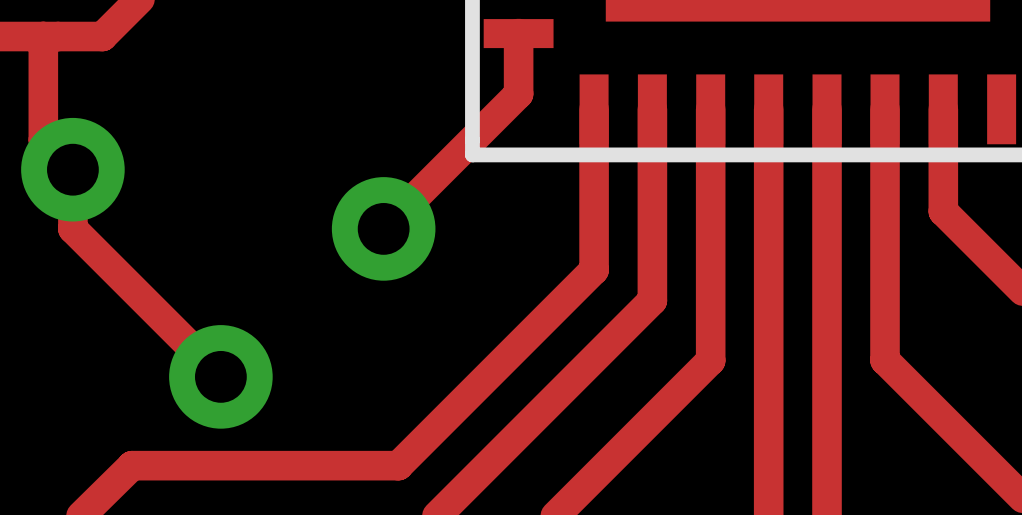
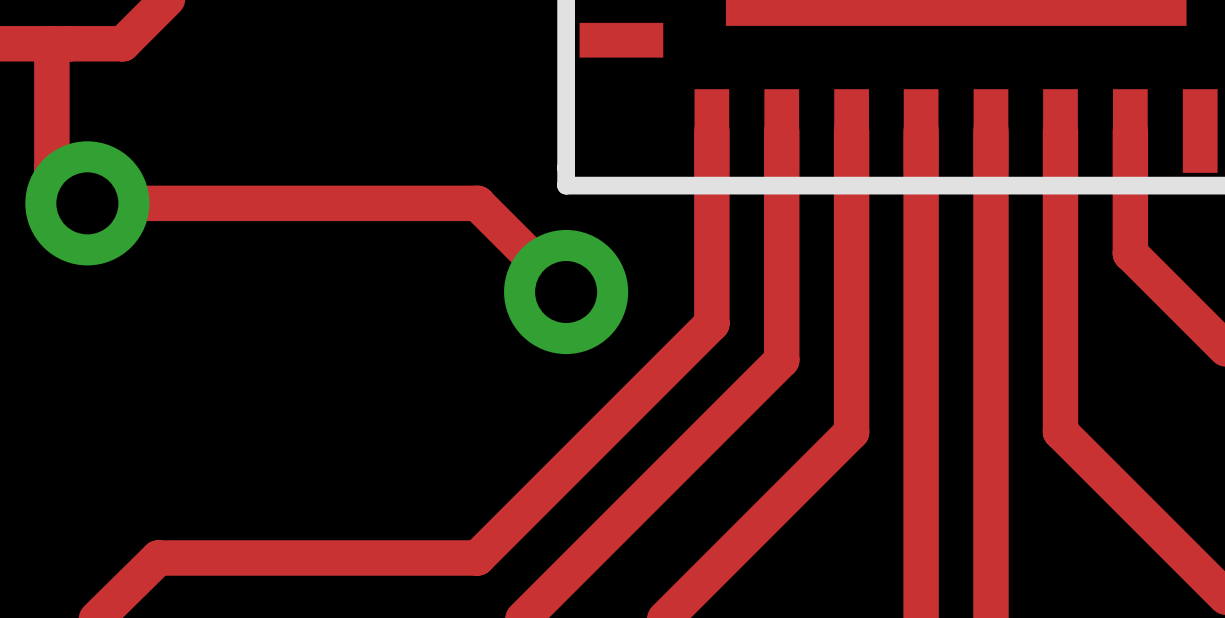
track: (518, 33) (518, 93) (383, 228) -> none
track: (72, 169) (72, 228) (220, 376) -> (87, 203) (477, 203) (566, 292)
via position: (383, 228) -> (566, 292)
via: (220, 376) -> none

